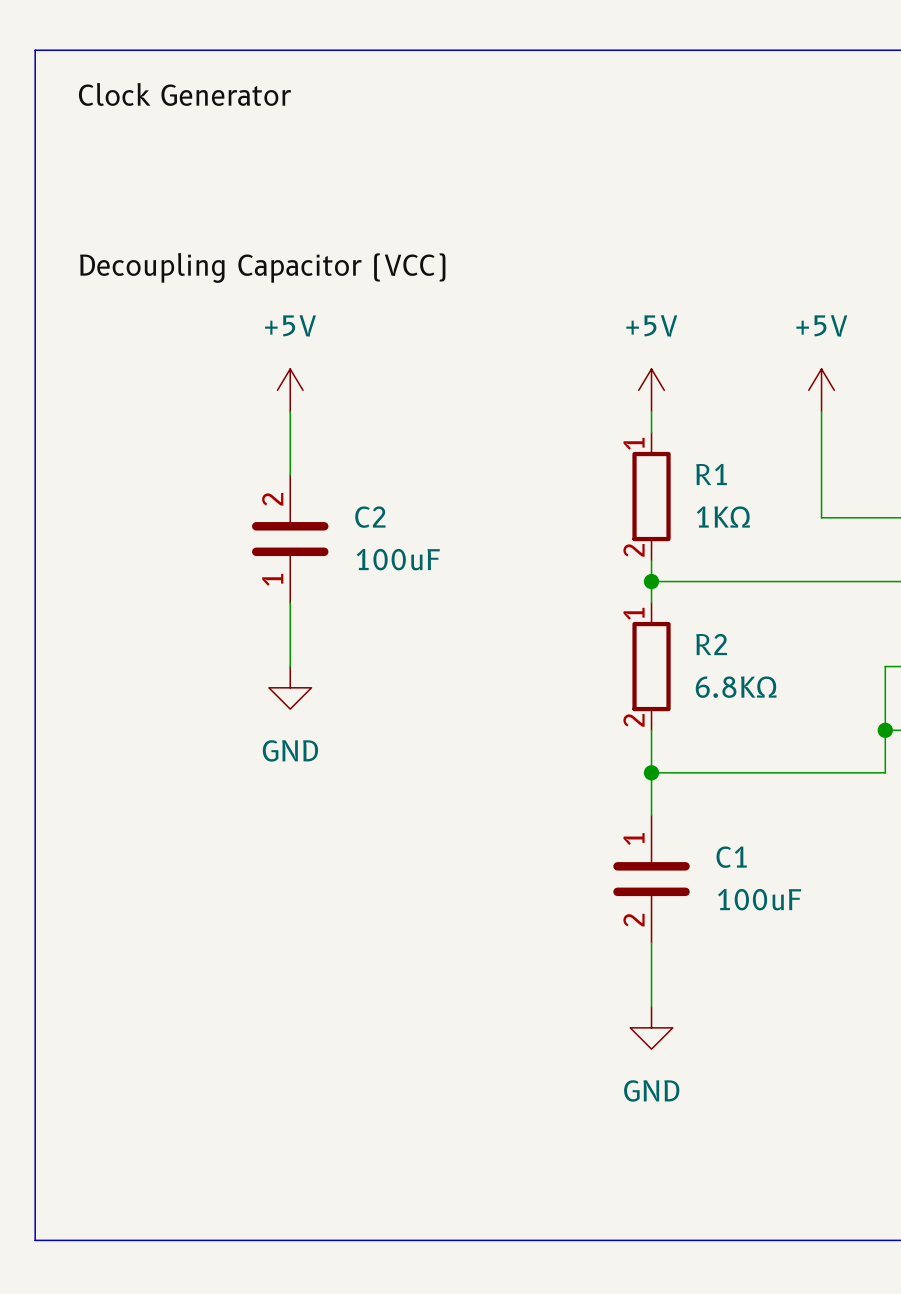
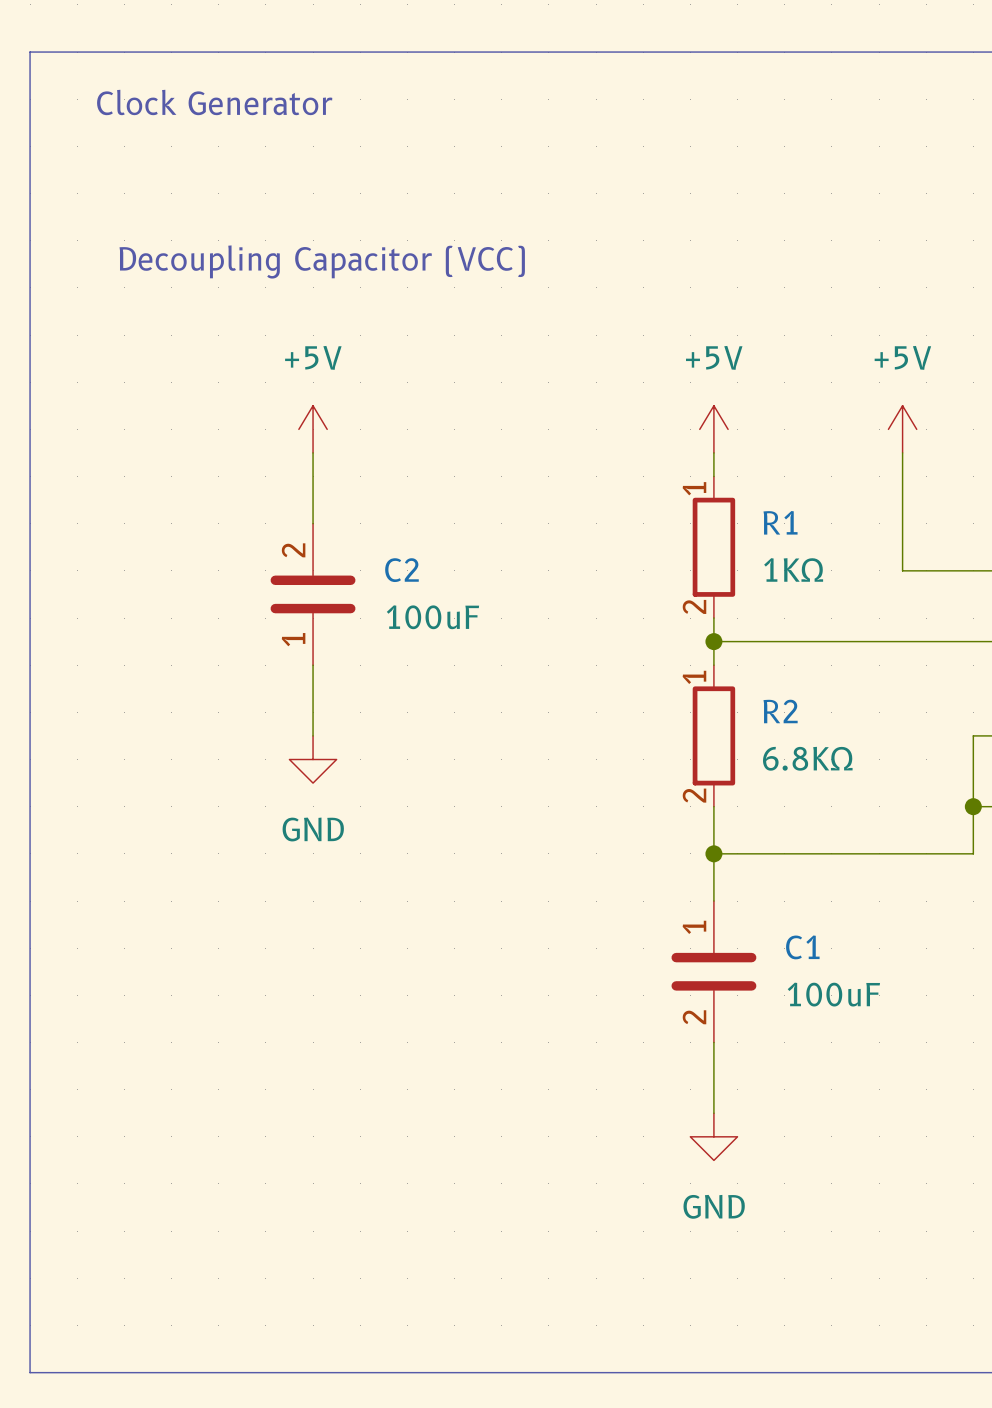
label: Clock Generator (184, 94) -> none
text: none -> Clock Generator (214, 102)
text: none -> Decoupling Capacitor (VCC) (322, 261)
label: Decoupling Capacitor (VCC) (262, 267) -> none

